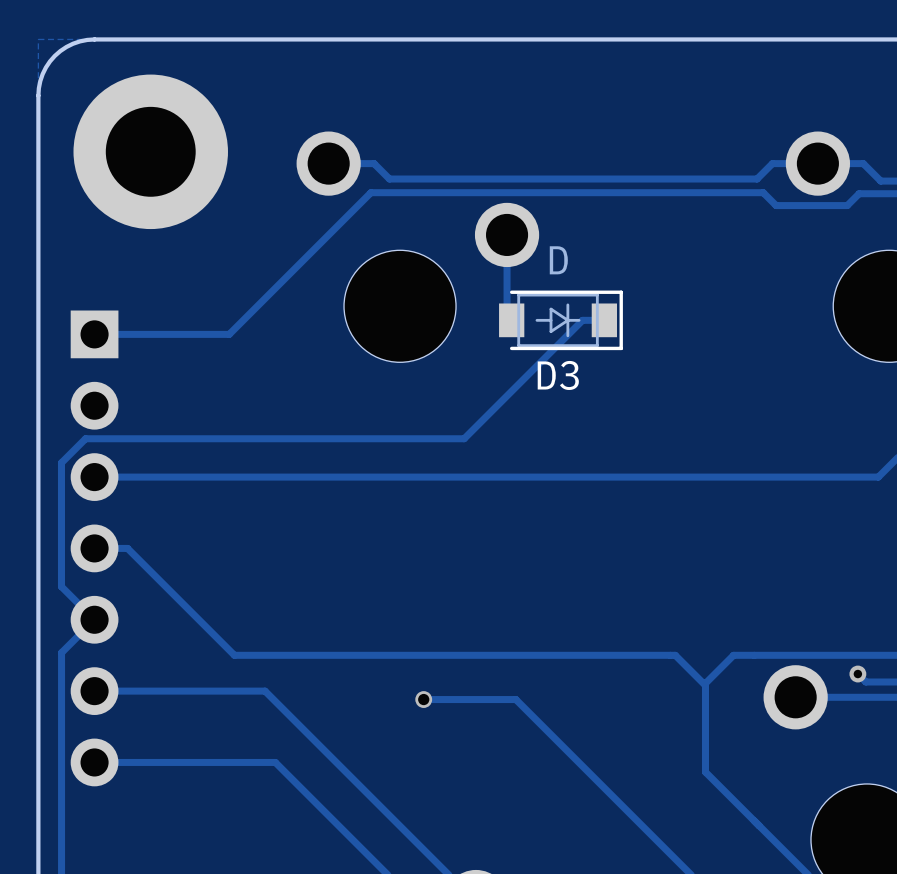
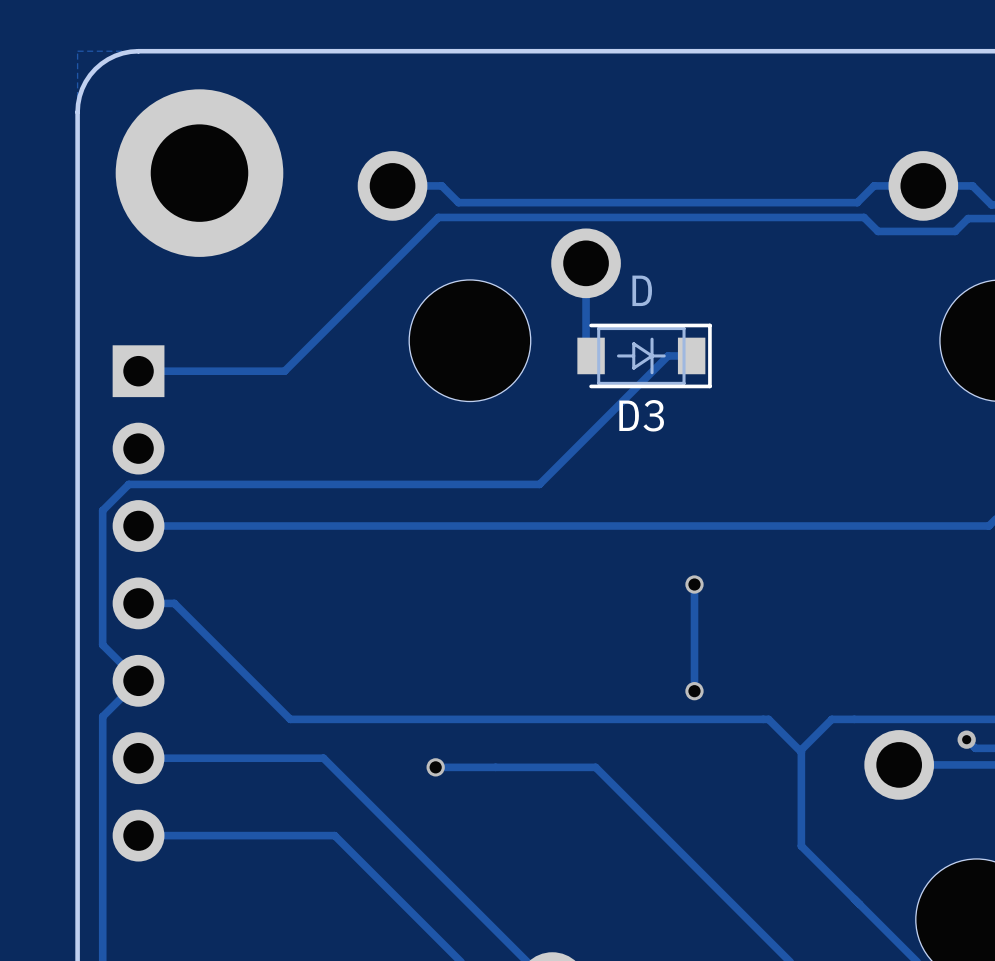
track: none -> (694, 584) (694, 691)
via: none -> (694, 584)
via: none -> (694, 691)
track: none -> (495, 767) (435, 767)
via position: (423, 699) -> (435, 767)

